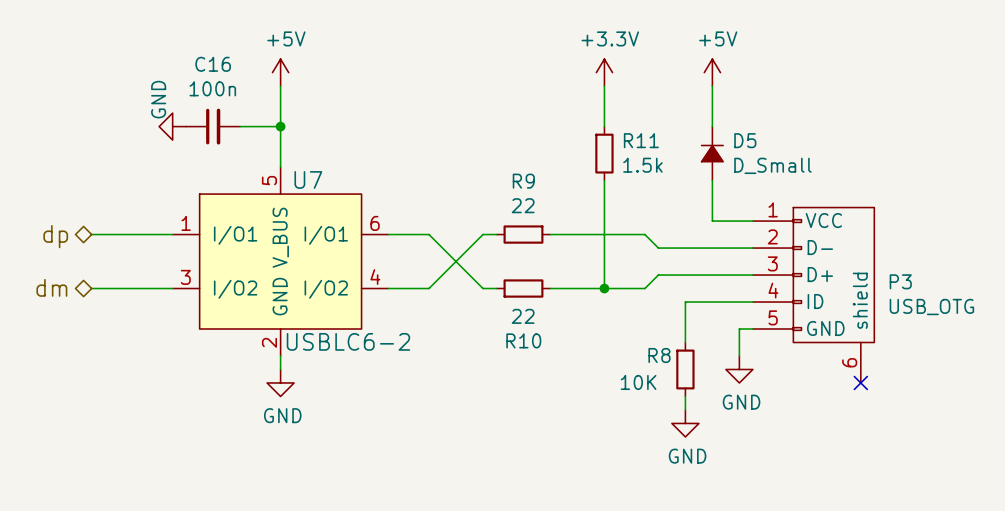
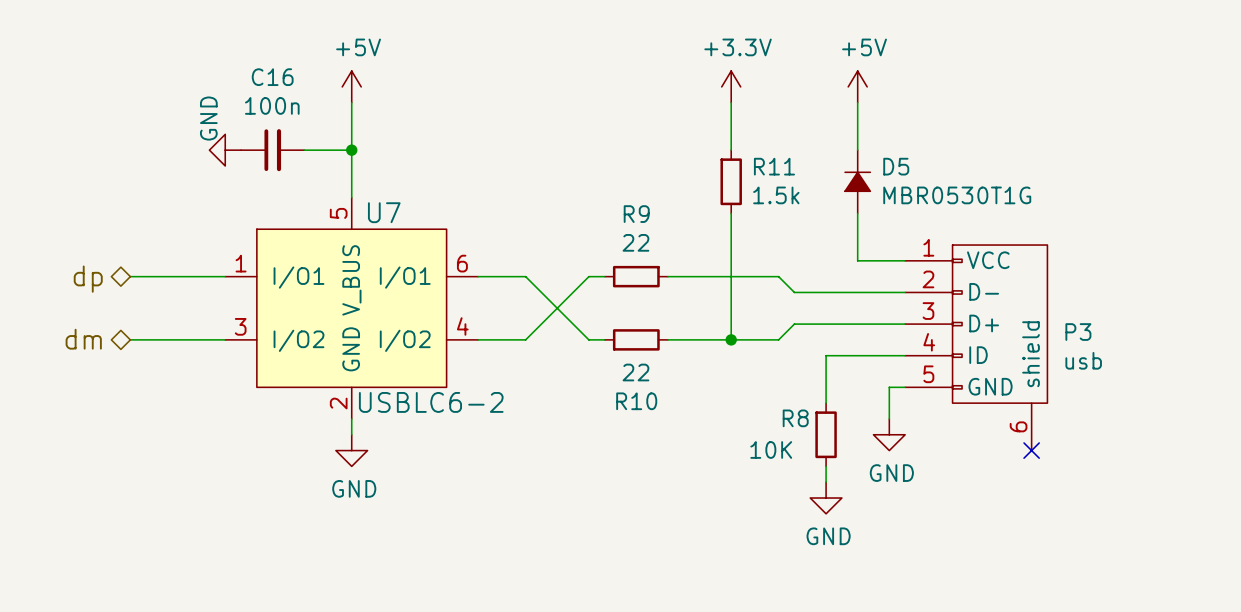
D5 value: D_Small (772, 165) -> MBR0530T1G (957, 195)
P3 value: USB_OTG (931, 307) -> usb (1083, 360)

